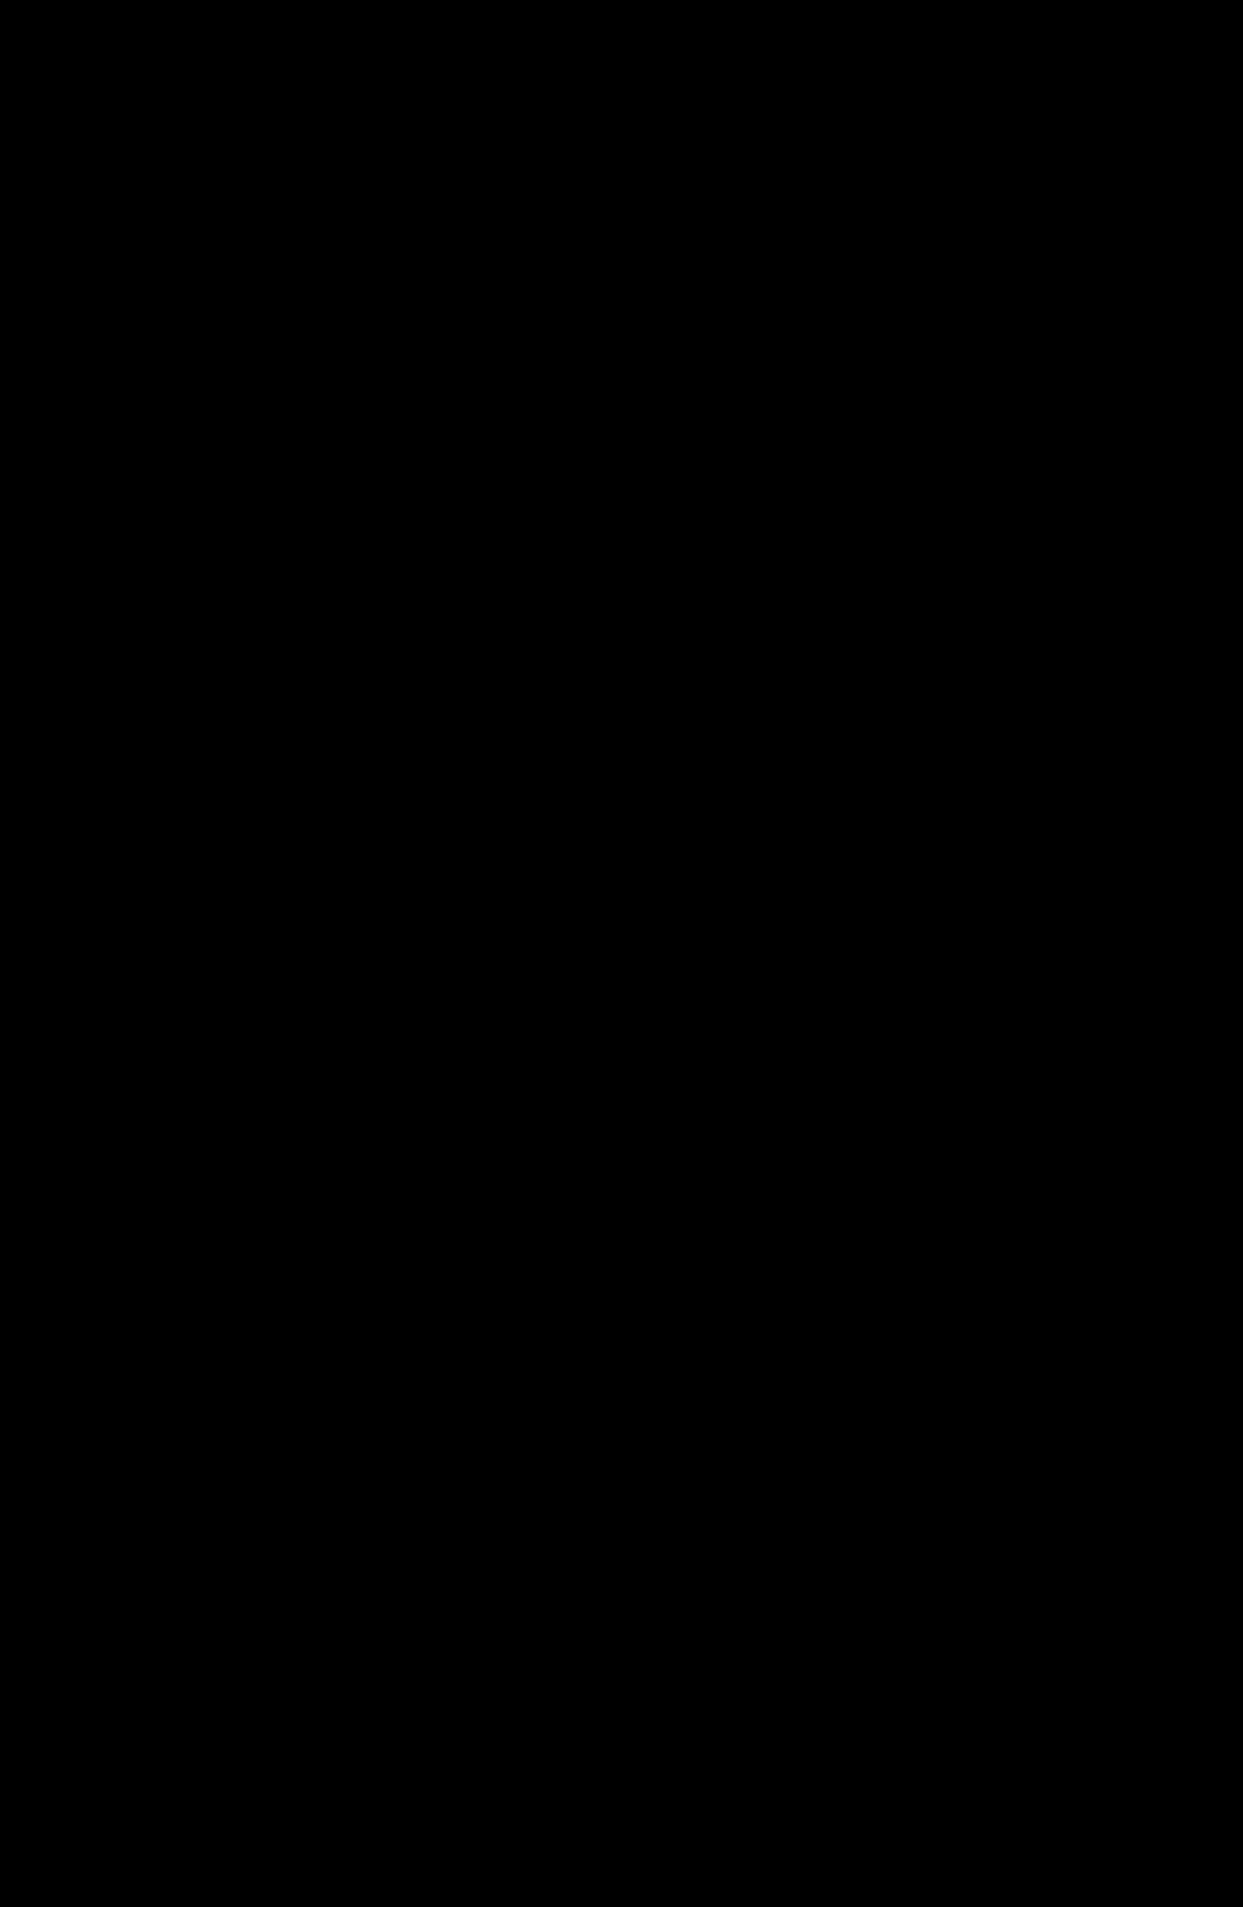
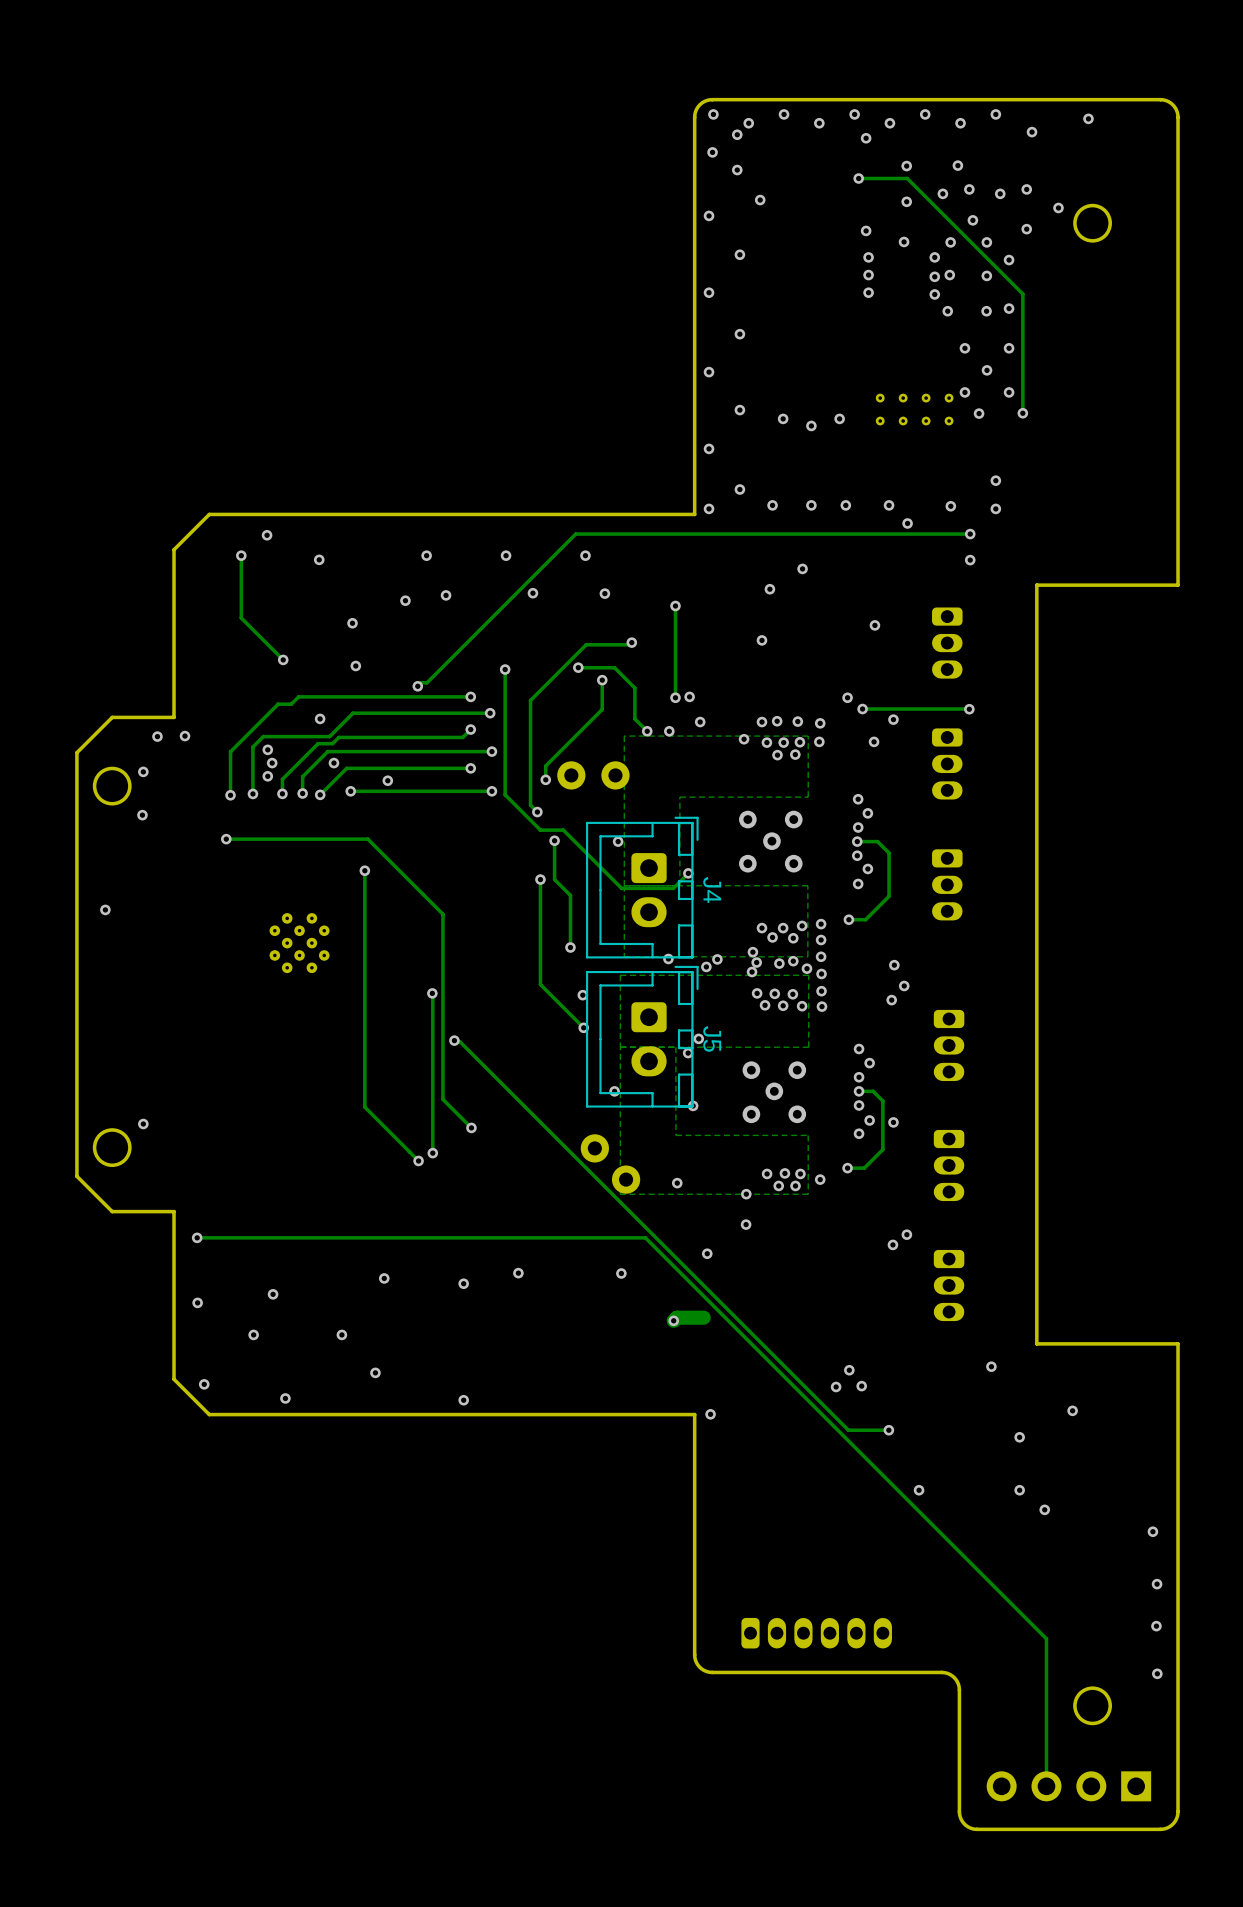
board edge: none -> (1160, 99) (712, 99) (702, 102) (696, 109) (694, 117) (694, 514) (209, 514) (174, 549) (174, 717) (112, 717) (76, 752) (76, 1176) (112, 1211) (174, 1211) (174, 1379) (209, 1414) (694, 1414) (694, 1654) (697, 1664) (704, 1670) (712, 1672) (941, 1672) (950, 1674) (957, 1681) (959, 1690) (959, 1813) (964, 1824) (975, 1829) (1162, 1829) (1172, 1824) (1177, 1814) (1178, 1343) (1036, 1343) (1036, 585) (1178, 585) (1178, 117) (1172, 104) (1160, 99)
via: none -> (713, 114)
via: none -> (784, 114)
via: none -> (854, 114)
via: none -> (925, 114)
via: none -> (995, 114)
via: none -> (1088, 118)
via: none -> (748, 123)
via: none -> (819, 123)
via: none -> (889, 123)
via: none -> (960, 123)
via: none -> (1032, 132)
via: none -> (737, 134)
via: none -> (866, 138)
via: none -> (712, 152)
via: none -> (957, 165)
via: none -> (906, 166)
via: none -> (737, 170)
track: none -> (858, 178) (907, 178) (1022, 294) (1022, 413)
via: none -> (858, 178)
via: none -> (969, 189)
via: none -> (1026, 189)
via: none -> (942, 193)
via: none -> (1000, 193)
via: none -> (760, 200)
via: none -> (906, 201)
round board edge: none -> [1073, 203, 1112, 243]
via: none -> (1058, 207)
via: none -> (709, 215)
via: none -> (972, 220)
via: none -> (1026, 229)
via: none -> (866, 230)
via: none -> (904, 241)
via: none -> (950, 242)
via: none -> (986, 242)
via: none -> (739, 254)
via: none -> (868, 257)
via: none -> (934, 257)
via: none -> (1009, 260)
via: none -> (868, 275)
via: none -> (949, 275)
via: none -> (986, 275)
via: none -> (934, 276)
via: none -> (709, 292)
via: none -> (868, 292)
via: none -> (934, 294)
via: none -> (1009, 308)
via: none -> (947, 311)
via: none -> (986, 311)
via: none -> (739, 334)
via: none -> (964, 348)
via: none -> (1009, 348)
via: none -> (987, 370)
via: none -> (709, 372)
via: none -> (964, 392)
via: none -> (1009, 392)
part: none -> (914, 409)
via: none -> (739, 410)
via: none -> (979, 413)
via: none -> (1022, 413)
via: none -> (783, 418)
via: none -> (839, 418)
via: none -> (811, 425)
via: none -> (709, 448)
via: none -> (995, 480)
via: none -> (739, 489)
via: none -> (772, 505)
via: none -> (811, 505)
via: none -> (845, 505)
via: none -> (889, 505)
via: none -> (950, 506)
via: none -> (709, 508)
via: none -> (995, 508)
via: none -> (907, 523)
track: none -> (970, 534) (575, 534) (427, 682) (421, 682) (417, 686)
via: none -> (970, 534)
via: none -> (267, 535)
track: none -> (241, 555) (241, 618) (283, 659)
via: none -> (241, 555)
via: none -> (426, 555)
via: none -> (506, 555)
via: none -> (585, 555)
via: none -> (319, 559)
via: none -> (970, 560)
via: none -> (802, 568)
via: none -> (769, 589)
via: none -> (532, 593)
via: none -> (604, 593)
via: none -> (446, 595)
via: none -> (405, 600)
track: none -> (675, 605) (675, 697)
via: none -> (675, 605)
via: none -> (352, 623)
via: none -> (874, 625)
via: none -> (761, 640)
track: none -> (631, 642) (629, 644) (586, 644) (530, 700) (530, 805) (537, 812)
via: none -> (631, 642)
part: none -> (947, 643)
via: none -> (283, 659)
via: none -> (355, 665)
track: none -> (578, 667) (614, 667) (634, 688) (634, 718) (647, 731)
via: none -> (578, 667)
track: none -> (505, 669) (505, 794) (540, 830) (563, 830) (621, 888) (673, 888) (688, 873)
via: none -> (505, 669)
track: none -> (602, 680) (602, 709) (545, 765) (545, 779)
via: none -> (602, 680)
via: none -> (417, 686)
track: none -> (470, 696) (298, 696) (291, 704) (278, 704) (230, 751) (230, 795)
via: none -> (470, 696)
via: none -> (689, 696)
via: none -> (675, 697)
via: none -> (847, 697)
via: none -> (862, 709)
track: none -> (969, 709) (862, 709)
via: none -> (969, 709)
track: none -> (490, 713) (353, 713) (329, 736) (263, 736) (252, 747) (252, 793)
via: none -> (490, 713)
via: none -> (320, 718)
via: none -> (893, 719)
via: none -> (777, 721)
via: none -> (797, 721)
via: none -> (700, 722)
via: none -> (761, 722)
via: none -> (820, 723)
track: none -> (470, 729) (462, 737) (338, 737) (332, 743) (318, 743) (282, 779) (282, 793)
via: none -> (470, 729)
via: none -> (647, 731)
via: none -> (669, 731)
via: none -> (157, 736)
via: none -> (185, 736)
via: none -> (744, 739)
via: none -> (819, 741)
via: none -> (874, 741)
via: none -> (766, 742)
via: none -> (783, 742)
via: none -> (799, 742)
via: none -> (267, 749)
track: none -> (491, 751) (327, 751) (302, 776) (302, 793)
via: none -> (491, 751)
via: none -> (795, 754)
via: none -> (777, 755)
via: none -> (272, 763)
via: none -> (333, 763)
part: none -> (947, 763)
round board edge: none -> [92, 766, 132, 806]
track: none -> (470, 768) (346, 768) (320, 794)
via: none -> (470, 768)
via: none -> (143, 771)
part: none -> (593, 775)
via: none -> (267, 776)
via: none -> (545, 779)
via: none -> (387, 780)
via: none -> (350, 791)
track: none -> (491, 791) (350, 791)
via: none -> (491, 791)
via: none -> (252, 793)
via: none -> (282, 793)
via: none -> (302, 793)
via: none -> (320, 794)
via: none -> (230, 795)
via: none -> (858, 799)
via: none -> (537, 812)
via: none -> (867, 813)
via: none -> (142, 815)
via: none -> (747, 819)
via: none -> (793, 819)
via: none -> (858, 827)
track: none -> (226, 839) (367, 839) (442, 914) (442, 1099) (471, 1127)
via: none -> (226, 839)
track: none -> (554, 840) (554, 879) (570, 895) (570, 947)
via: none -> (554, 840)
via: none -> (618, 841)
via: none -> (771, 841)
track: none -> (857, 841) (877, 841) (889, 853) (889, 896) (865, 919) (848, 919)
via: none -> (857, 841)
via: none -> (857, 855)
via: none -> (747, 863)
via: none -> (793, 863)
via: none -> (867, 868)
track: none -> (364, 870) (364, 1107) (418, 1160)
via: none -> (364, 870)
via: none -> (688, 873)
track: none -> (540, 879) (540, 984) (583, 1027)
via: none -> (540, 879)
via: none -> (858, 883)
part: none -> (947, 884)
zone outline: none -> (679, 885) (679, 797) (808, 797) (808, 736) (624, 736) (624, 956) (807, 956) (807, 885) (624, 885)
J4: none -> (642, 887)
via: none -> (105, 909)
via: none -> (848, 919)
via: none -> (821, 924)
via: none -> (802, 925)
via: none -> (761, 928)
via: none -> (783, 928)
via: none -> (772, 937)
via: none -> (793, 938)
via: none -> (821, 940)
part: none -> (299, 943)
via: none -> (570, 947)
via: none -> (752, 952)
via: none -> (821, 956)
via: none -> (668, 958)
via: none -> (717, 959)
via: none -> (793, 961)
via: none -> (756, 962)
via: none -> (779, 963)
via: none -> (894, 965)
via: none -> (706, 966)
via: none -> (806, 968)
via: none -> (752, 972)
via: none -> (821, 973)
via: none -> (904, 985)
via: none -> (821, 991)
track: none -> (432, 993) (432, 1153)
via: none -> (432, 993)
via: none -> (757, 993)
via: none -> (774, 993)
via: none -> (792, 994)
via: none -> (582, 995)
via: none -> (891, 1000)
via: none -> (765, 1005)
via: none -> (783, 1005)
via: none -> (802, 1006)
via: none -> (821, 1006)
via: none -> (583, 1027)
J5: none -> (642, 1036)
via: none -> (698, 1038)
track: none -> (454, 1040) (459, 1041) (848, 1430) (888, 1430)
via: none -> (454, 1040)
part: none -> (949, 1045)
zone outline: none -> (675, 1047) (675, 1135) (808, 1135) (808, 1194) (620, 1194) (620, 975) (808, 975) (808, 1047) (620, 1047)
via: none -> (859, 1049)
via: none -> (688, 1053)
via: none -> (869, 1063)
via: none -> (751, 1070)
via: none -> (797, 1070)
via: none -> (859, 1077)
via: none -> (614, 1091)
via: none -> (774, 1091)
track: none -> (859, 1091) (873, 1091) (882, 1101) (882, 1149) (864, 1168) (847, 1168)
via: none -> (859, 1091)
via: none -> (693, 1105)
via: none -> (859, 1105)
via: none -> (751, 1114)
via: none -> (797, 1114)
via: none -> (869, 1120)
via: none -> (893, 1122)
via: none -> (143, 1124)
via: none -> (471, 1127)
round board edge: none -> [92, 1128, 132, 1168]
via: none -> (859, 1133)
via: none -> (432, 1153)
via: none -> (418, 1160)
part: none -> (610, 1164)
part: none -> (949, 1165)
via: none -> (847, 1168)
via: none -> (767, 1173)
via: none -> (784, 1173)
via: none -> (800, 1173)
via: none -> (820, 1179)
via: none -> (677, 1183)
via: none -> (778, 1185)
via: none -> (795, 1185)
via: none -> (746, 1194)
via: none -> (746, 1224)
via: none -> (906, 1234)
track: none -> (197, 1237) (645, 1237) (1046, 1638) (1046, 1786)
via: none -> (197, 1237)
via: none -> (892, 1244)
via: none -> (707, 1253)
via: none -> (518, 1273)
via: none -> (621, 1273)
via: none -> (384, 1278)
via: none -> (463, 1283)
part: none -> (949, 1285)
via: none -> (273, 1294)
via: none -> (197, 1302)
track: none -> (703, 1317) (676, 1317) (673, 1320)
via: none -> (673, 1320)
via: none -> (253, 1334)
via: none -> (341, 1334)
via: none -> (991, 1366)
via: none -> (849, 1370)
via: none -> (375, 1372)
via: none -> (204, 1384)
via: none -> (836, 1386)
via: none -> (861, 1386)
via: none -> (285, 1398)
via: none -> (463, 1400)
via: none -> (1072, 1410)
via: none -> (710, 1414)
via: none -> (888, 1430)
via: none -> (1019, 1437)
via: none -> (919, 1490)
via: none -> (1019, 1490)
via: none -> (1044, 1509)
via: none -> (1152, 1531)
via: none -> (1157, 1584)
via: none -> (1156, 1626)
part: none -> (816, 1633)
via: none -> (1157, 1673)
round board edge: none -> [1073, 1686, 1112, 1726]
part: none -> (1068, 1786)

